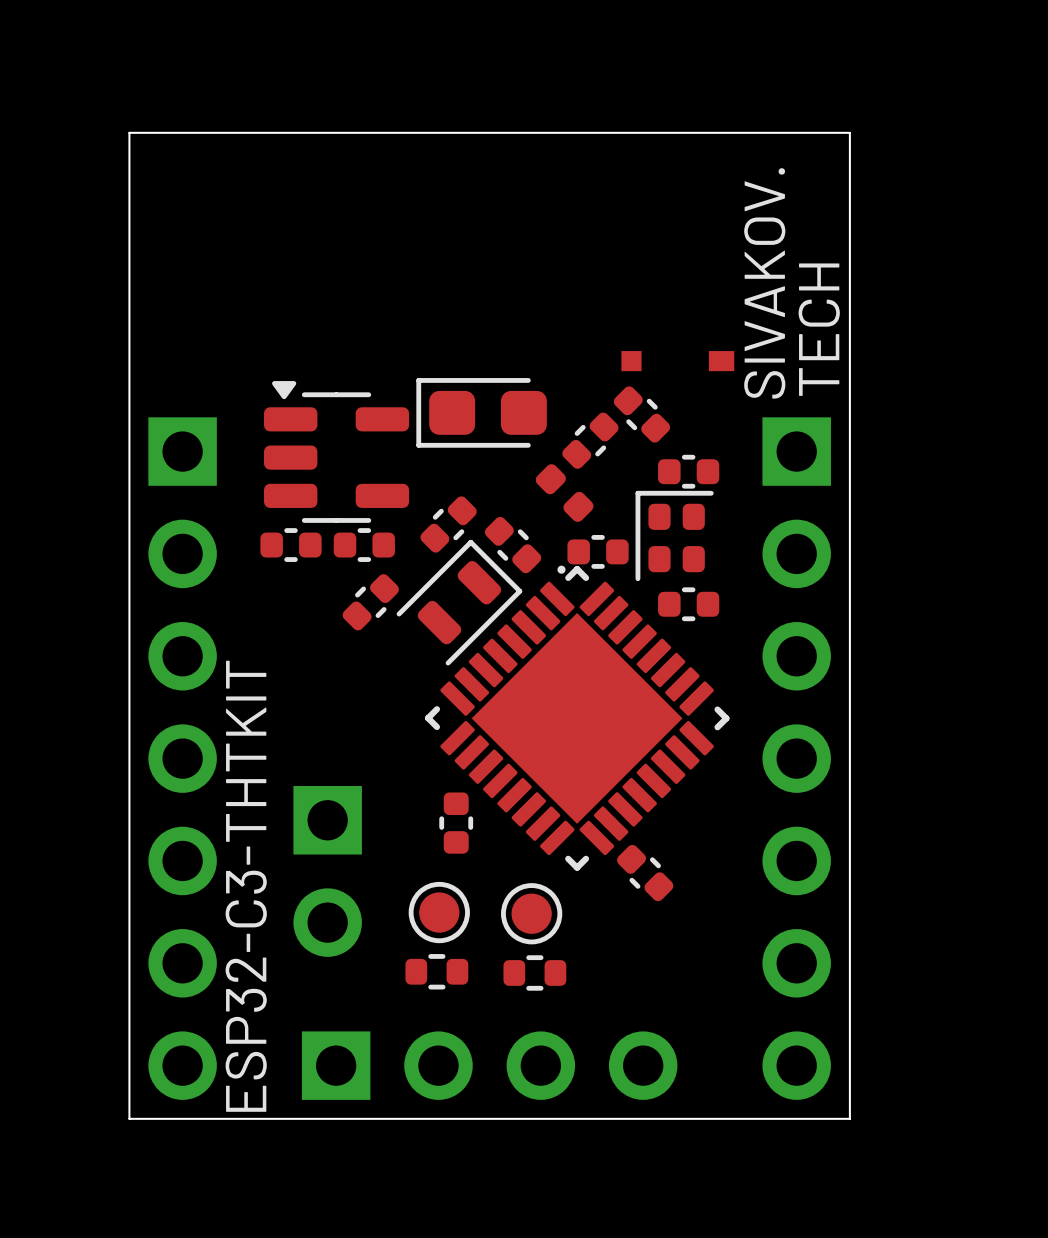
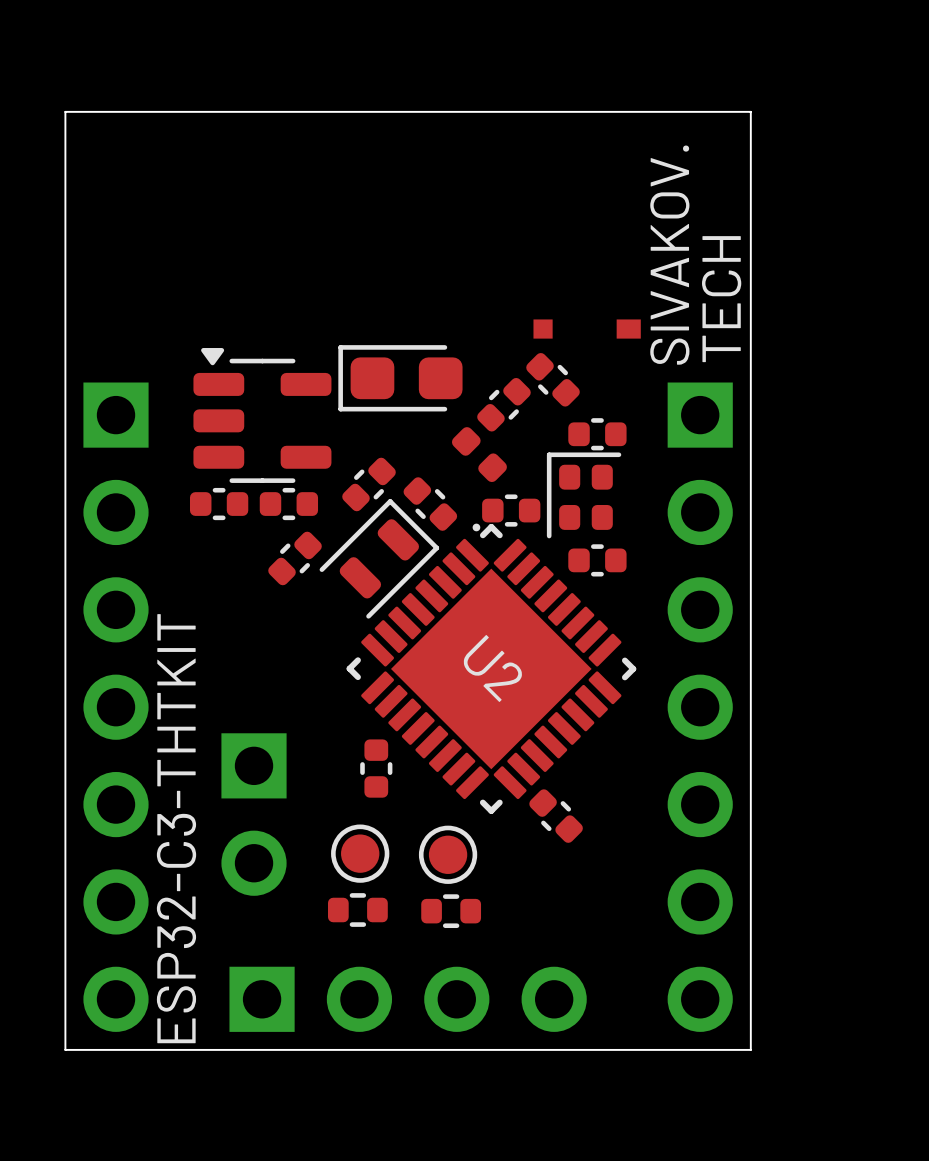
U2 name: none -> U2 (492, 668)

